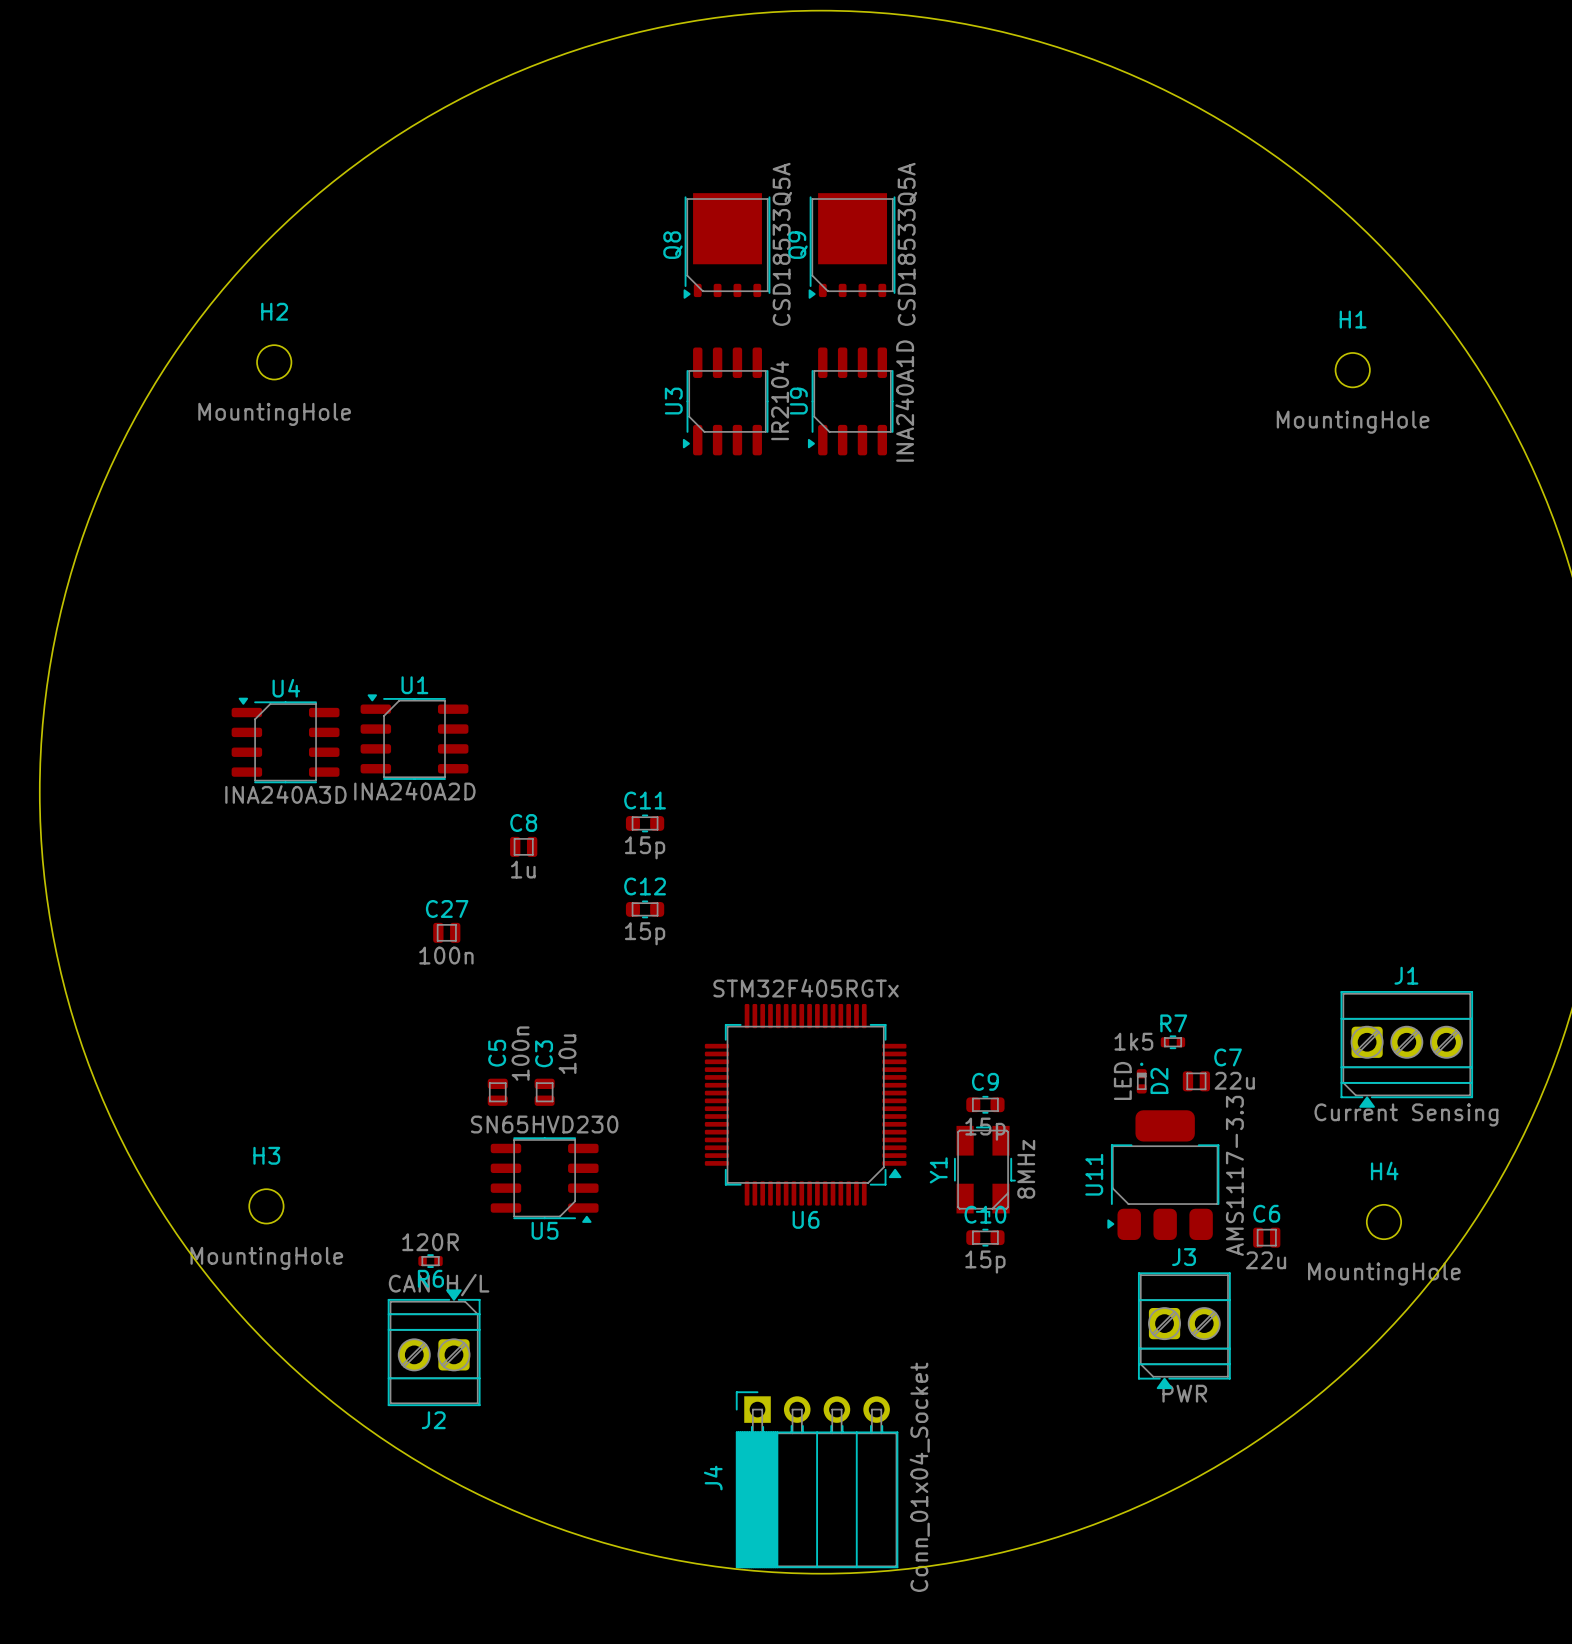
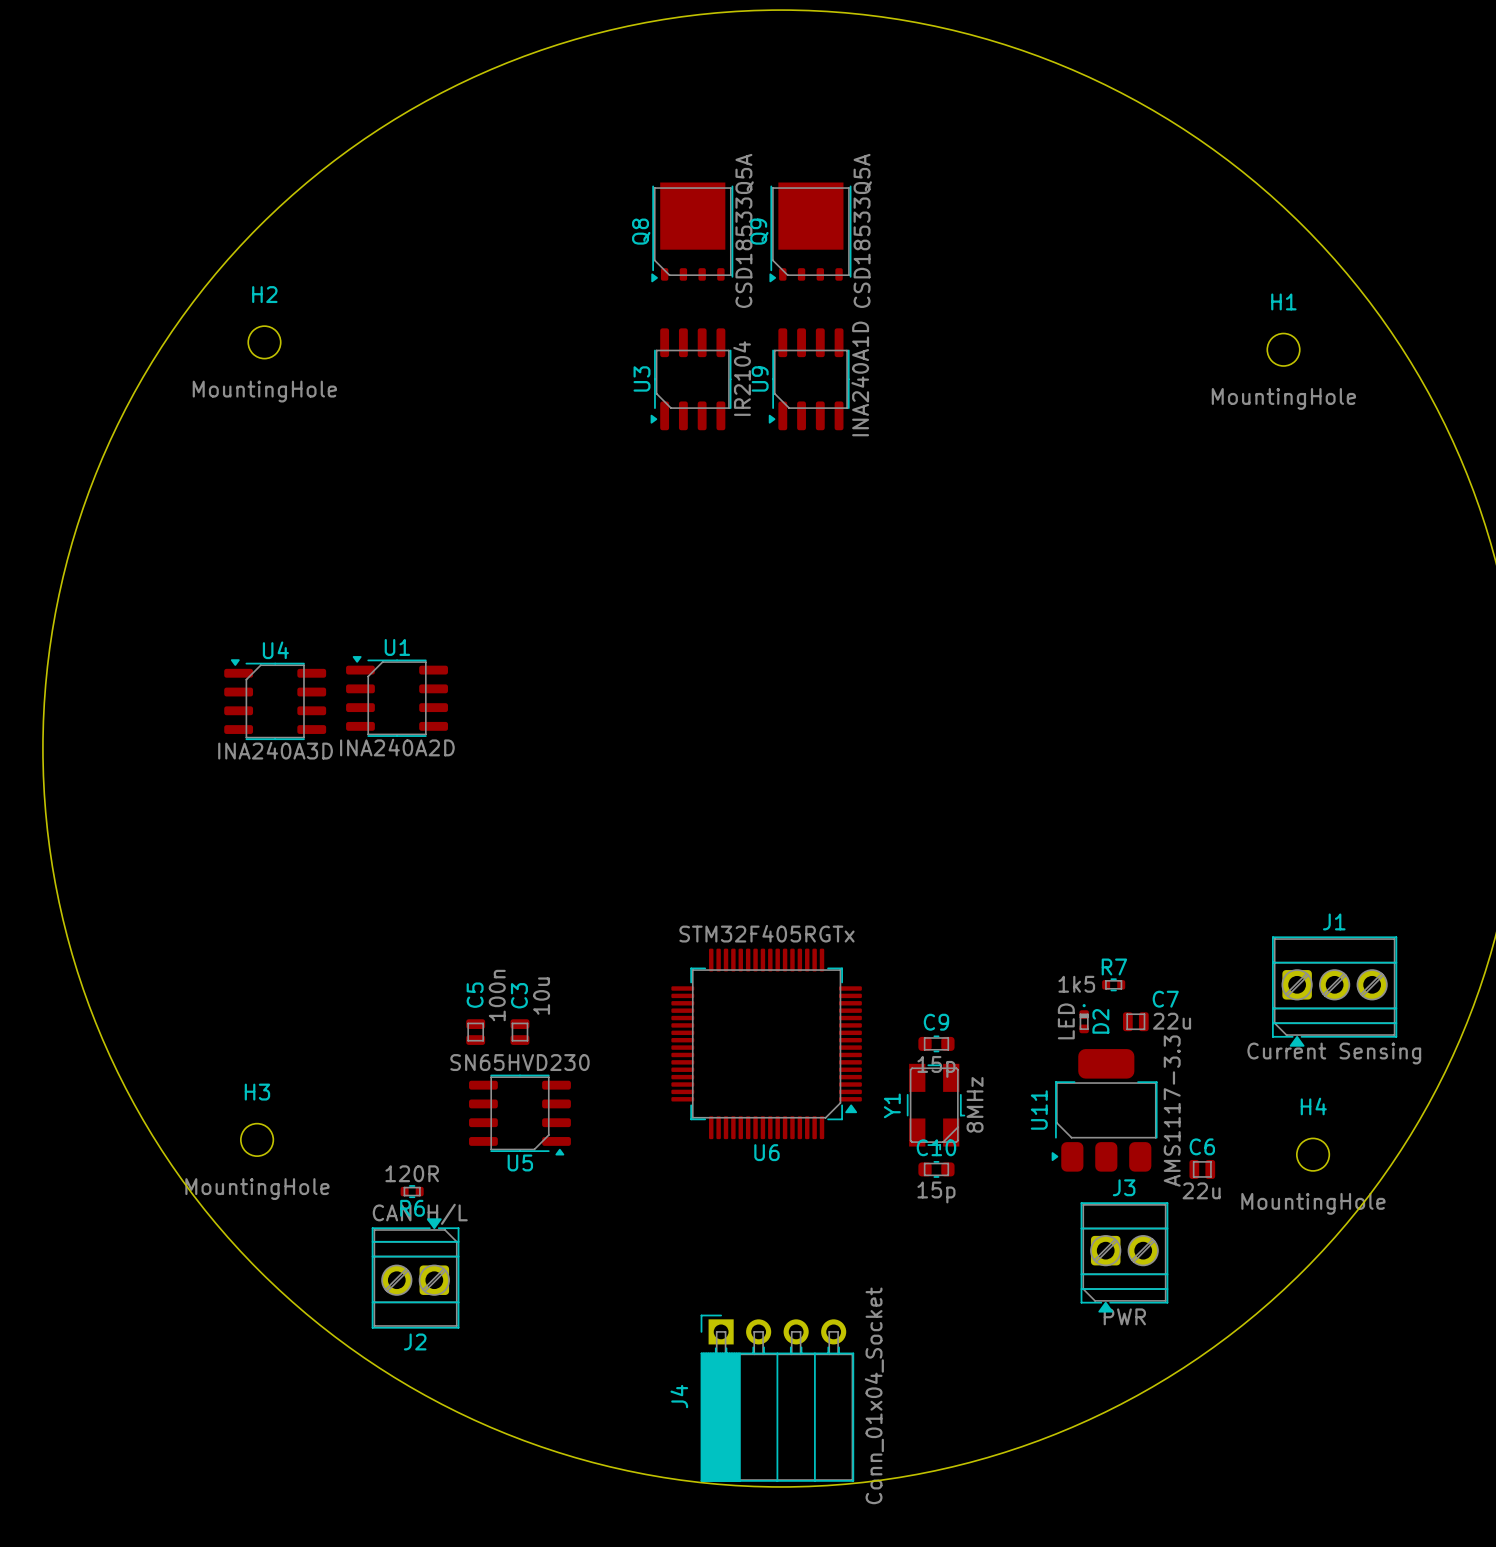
C11: 15p (645, 823) -> none
C8: 1u (523, 846) -> none
C12: 15p (645, 909) -> none
C27: 100n (446, 932) -> none

